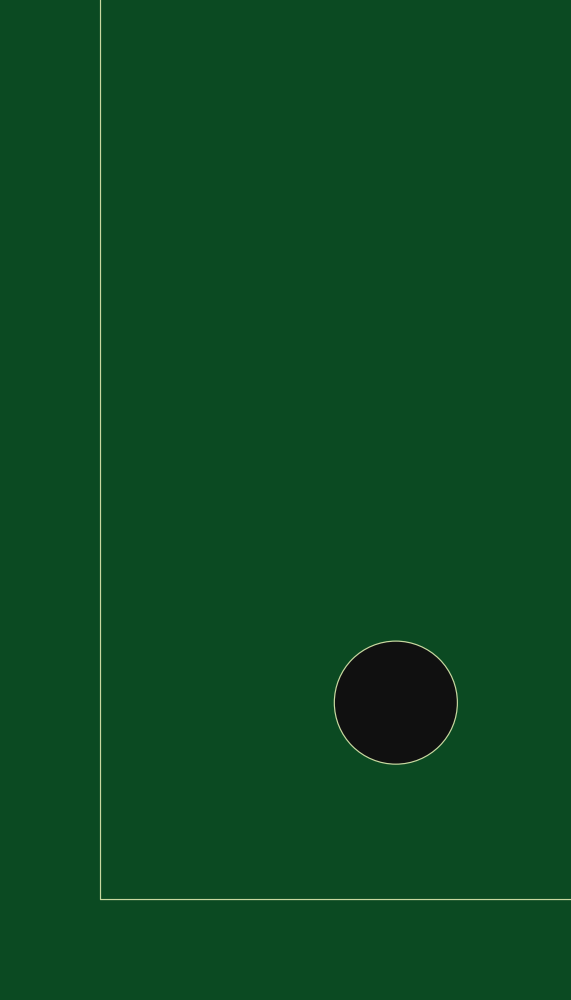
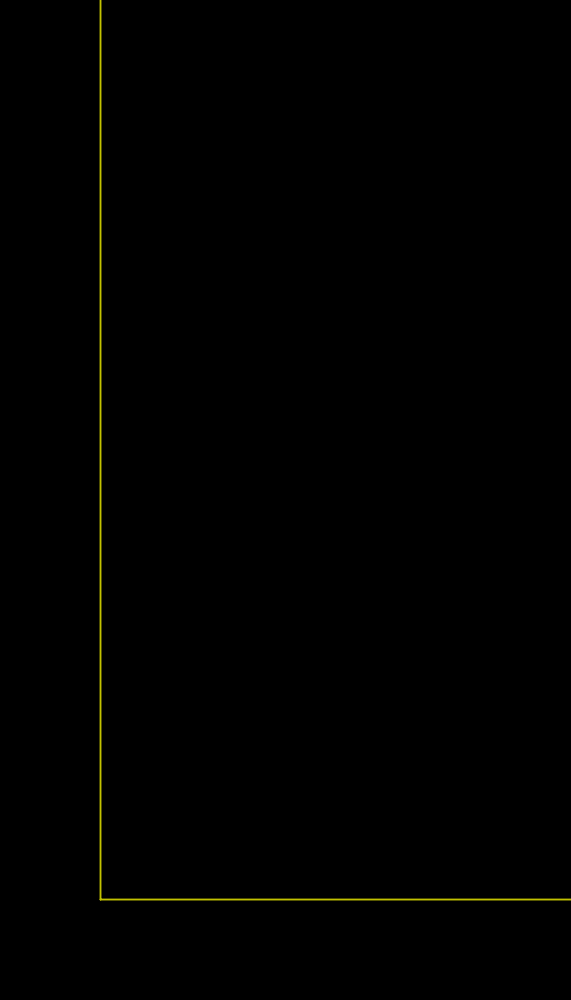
hole: (395, 702) -> none

